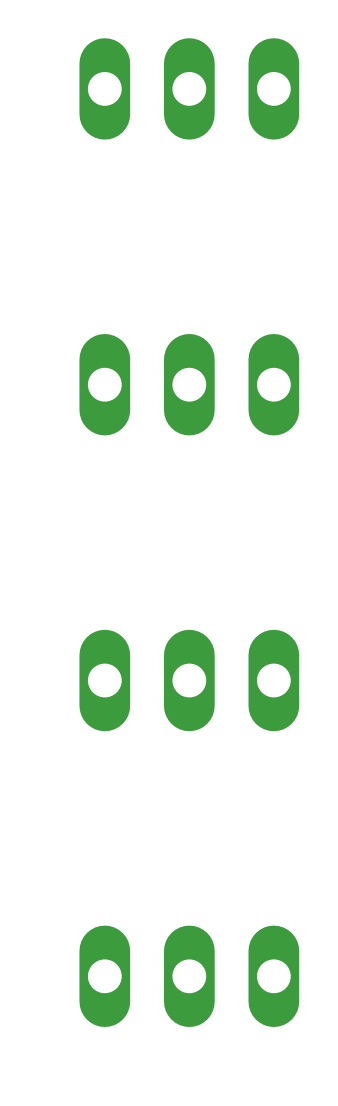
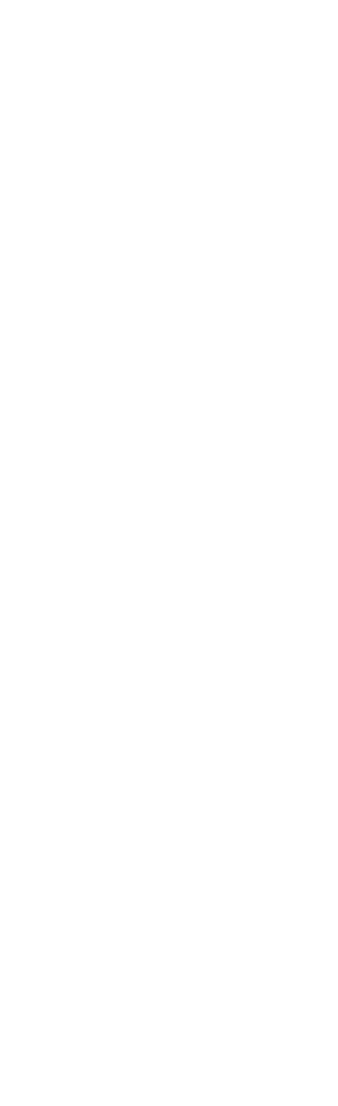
part: (189, 88) -> none
part: (189, 384) -> none
part: (189, 680) -> none
part: (189, 976) -> none

